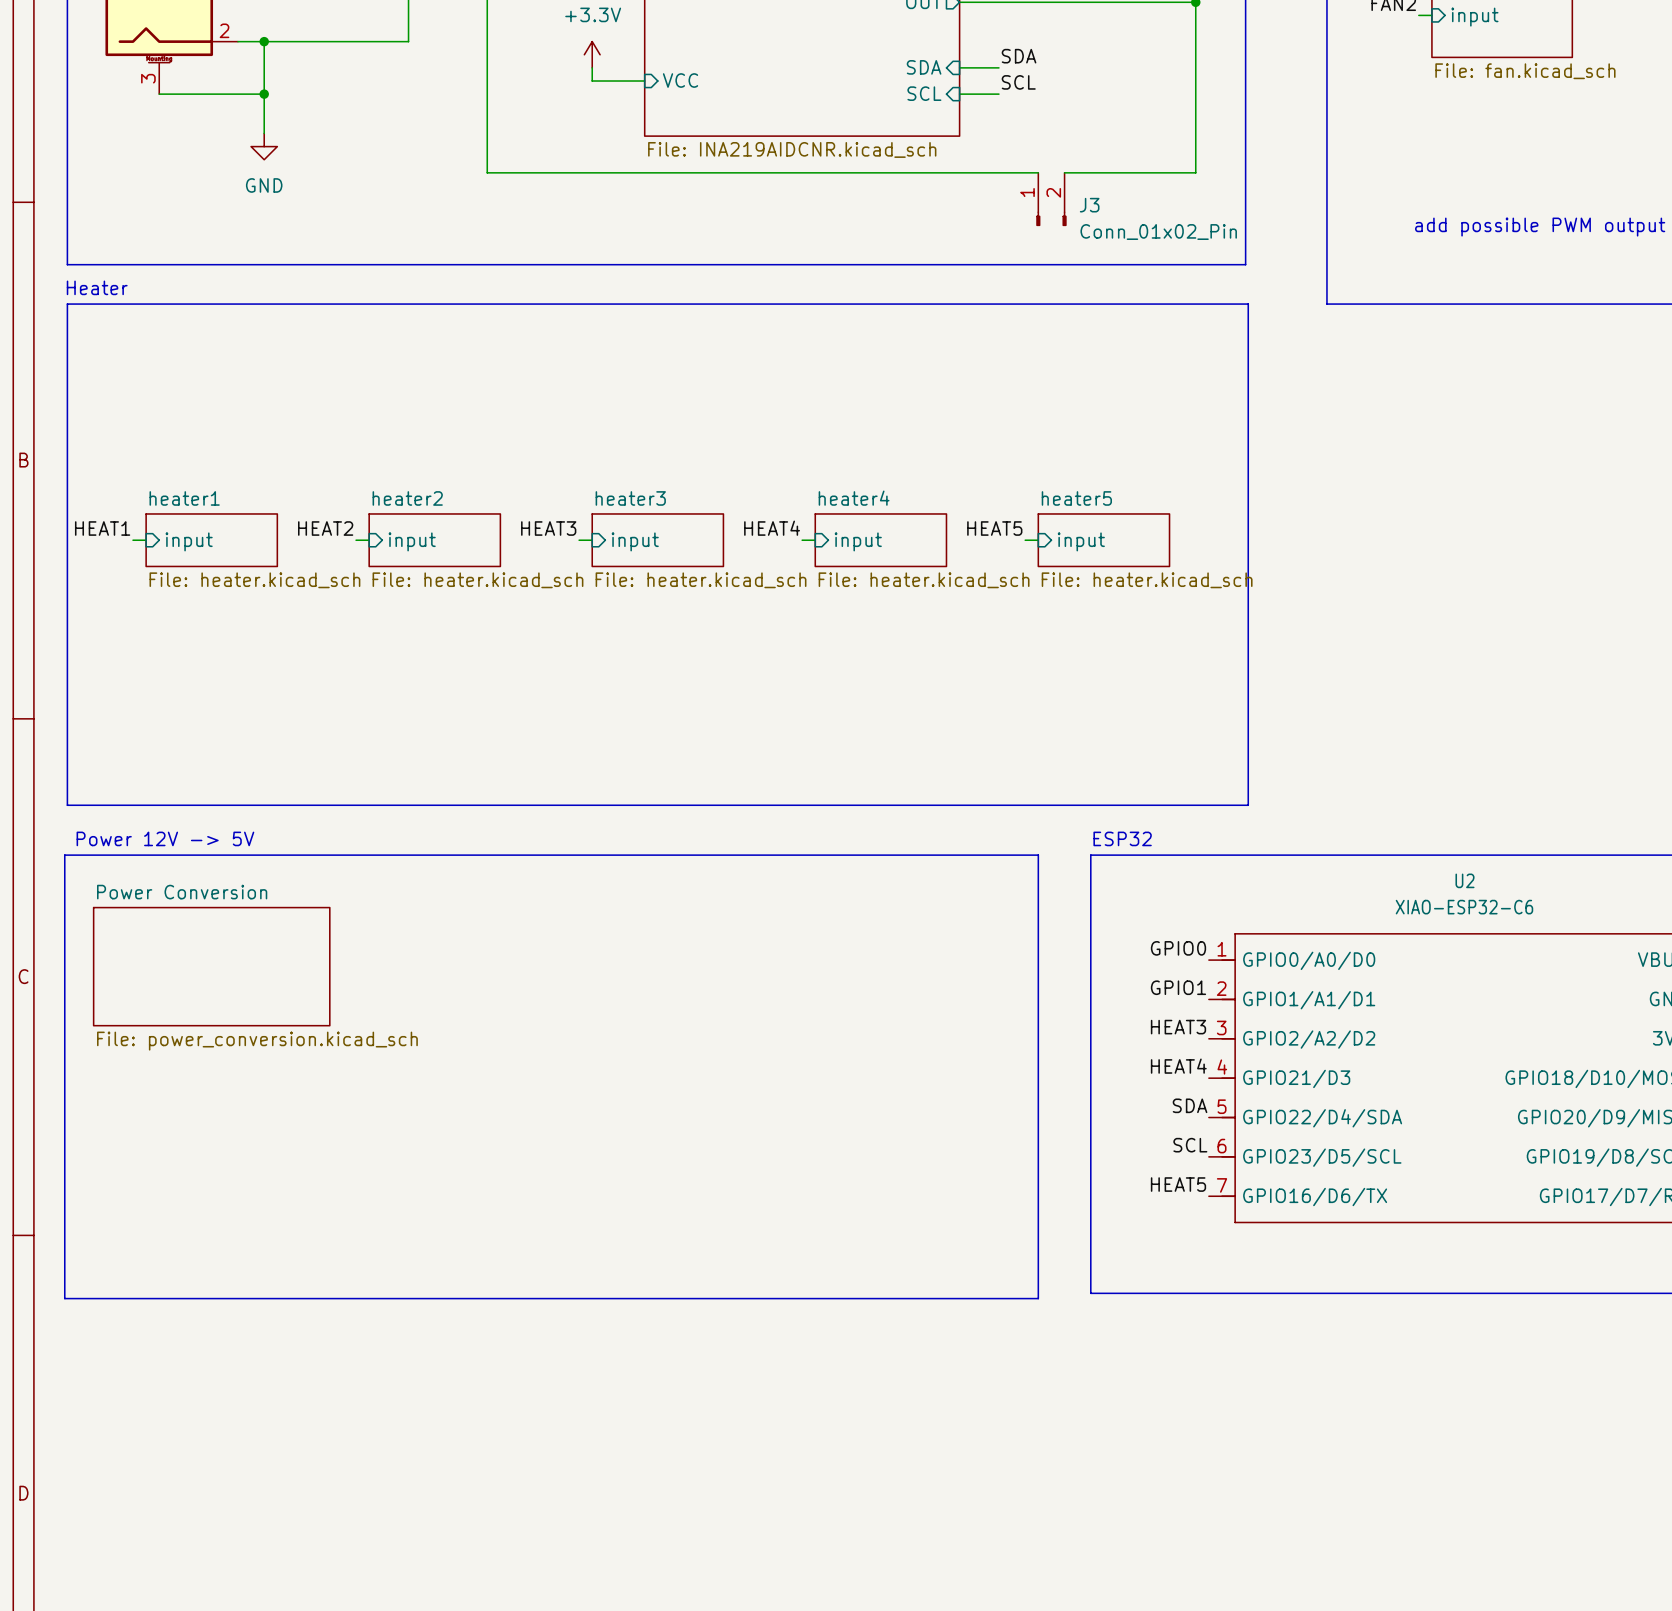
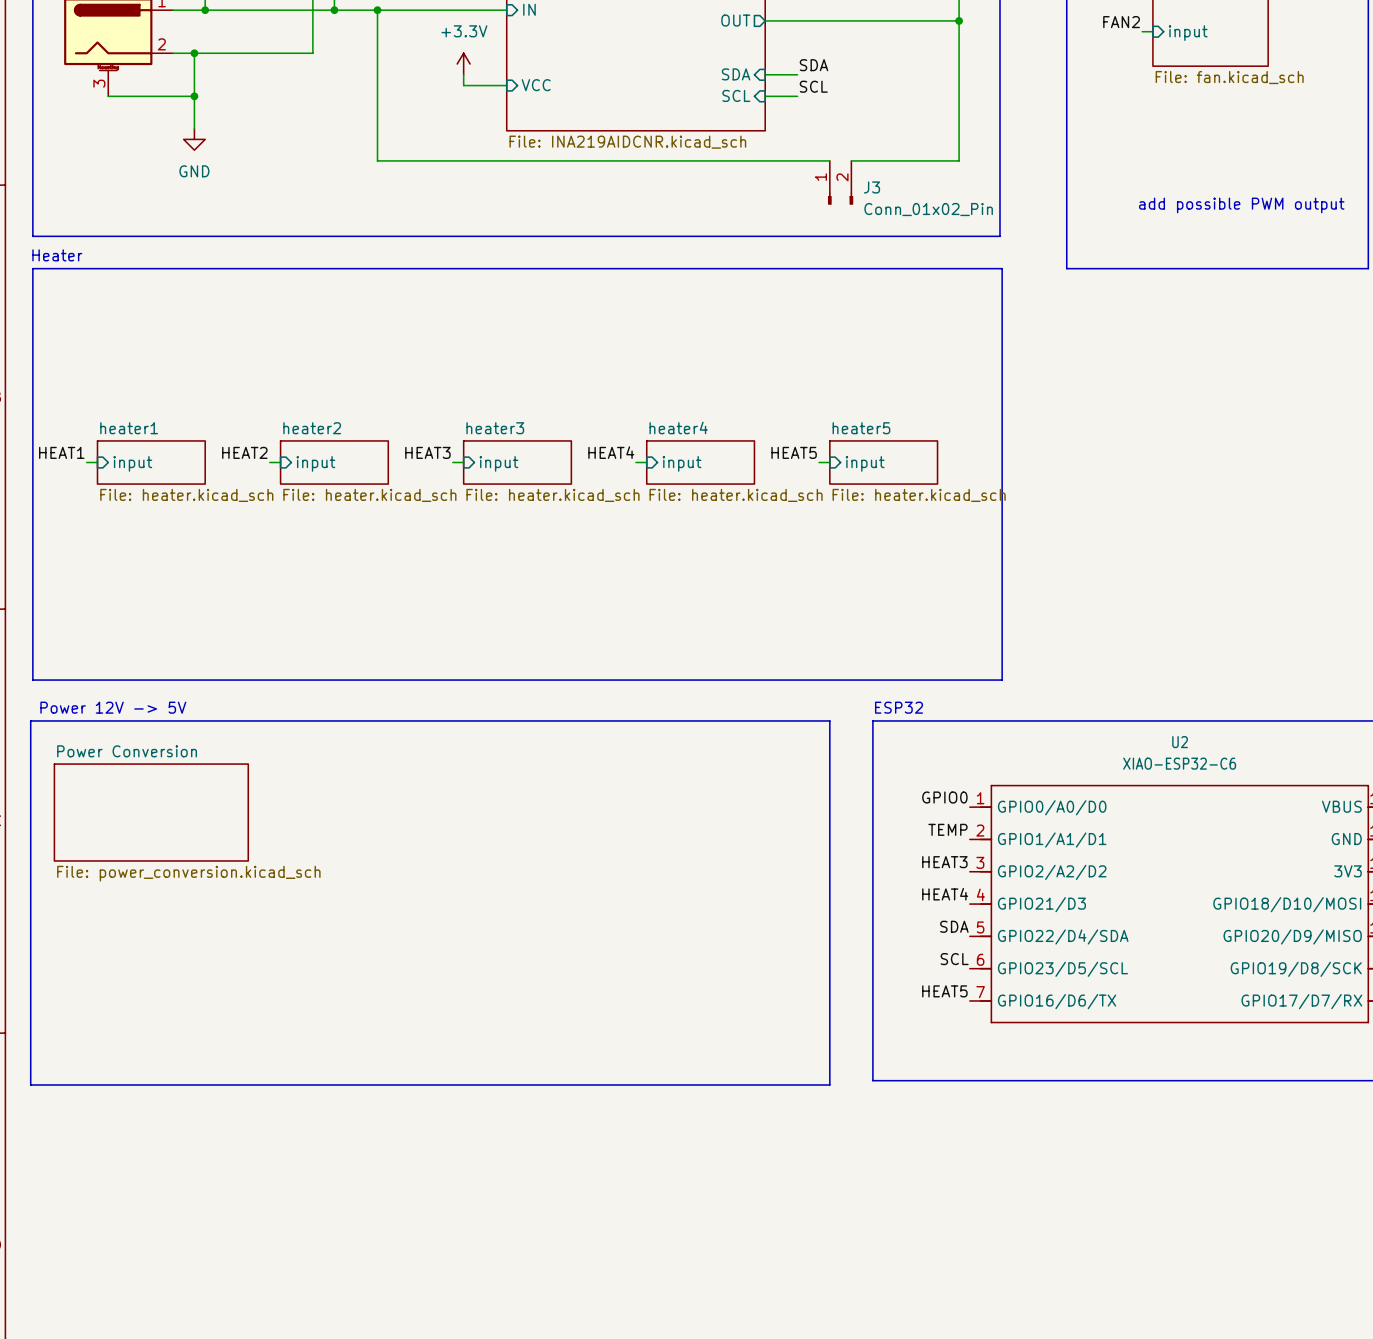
label: GPIO1 (1178, 987) -> TEMP (947, 829)

